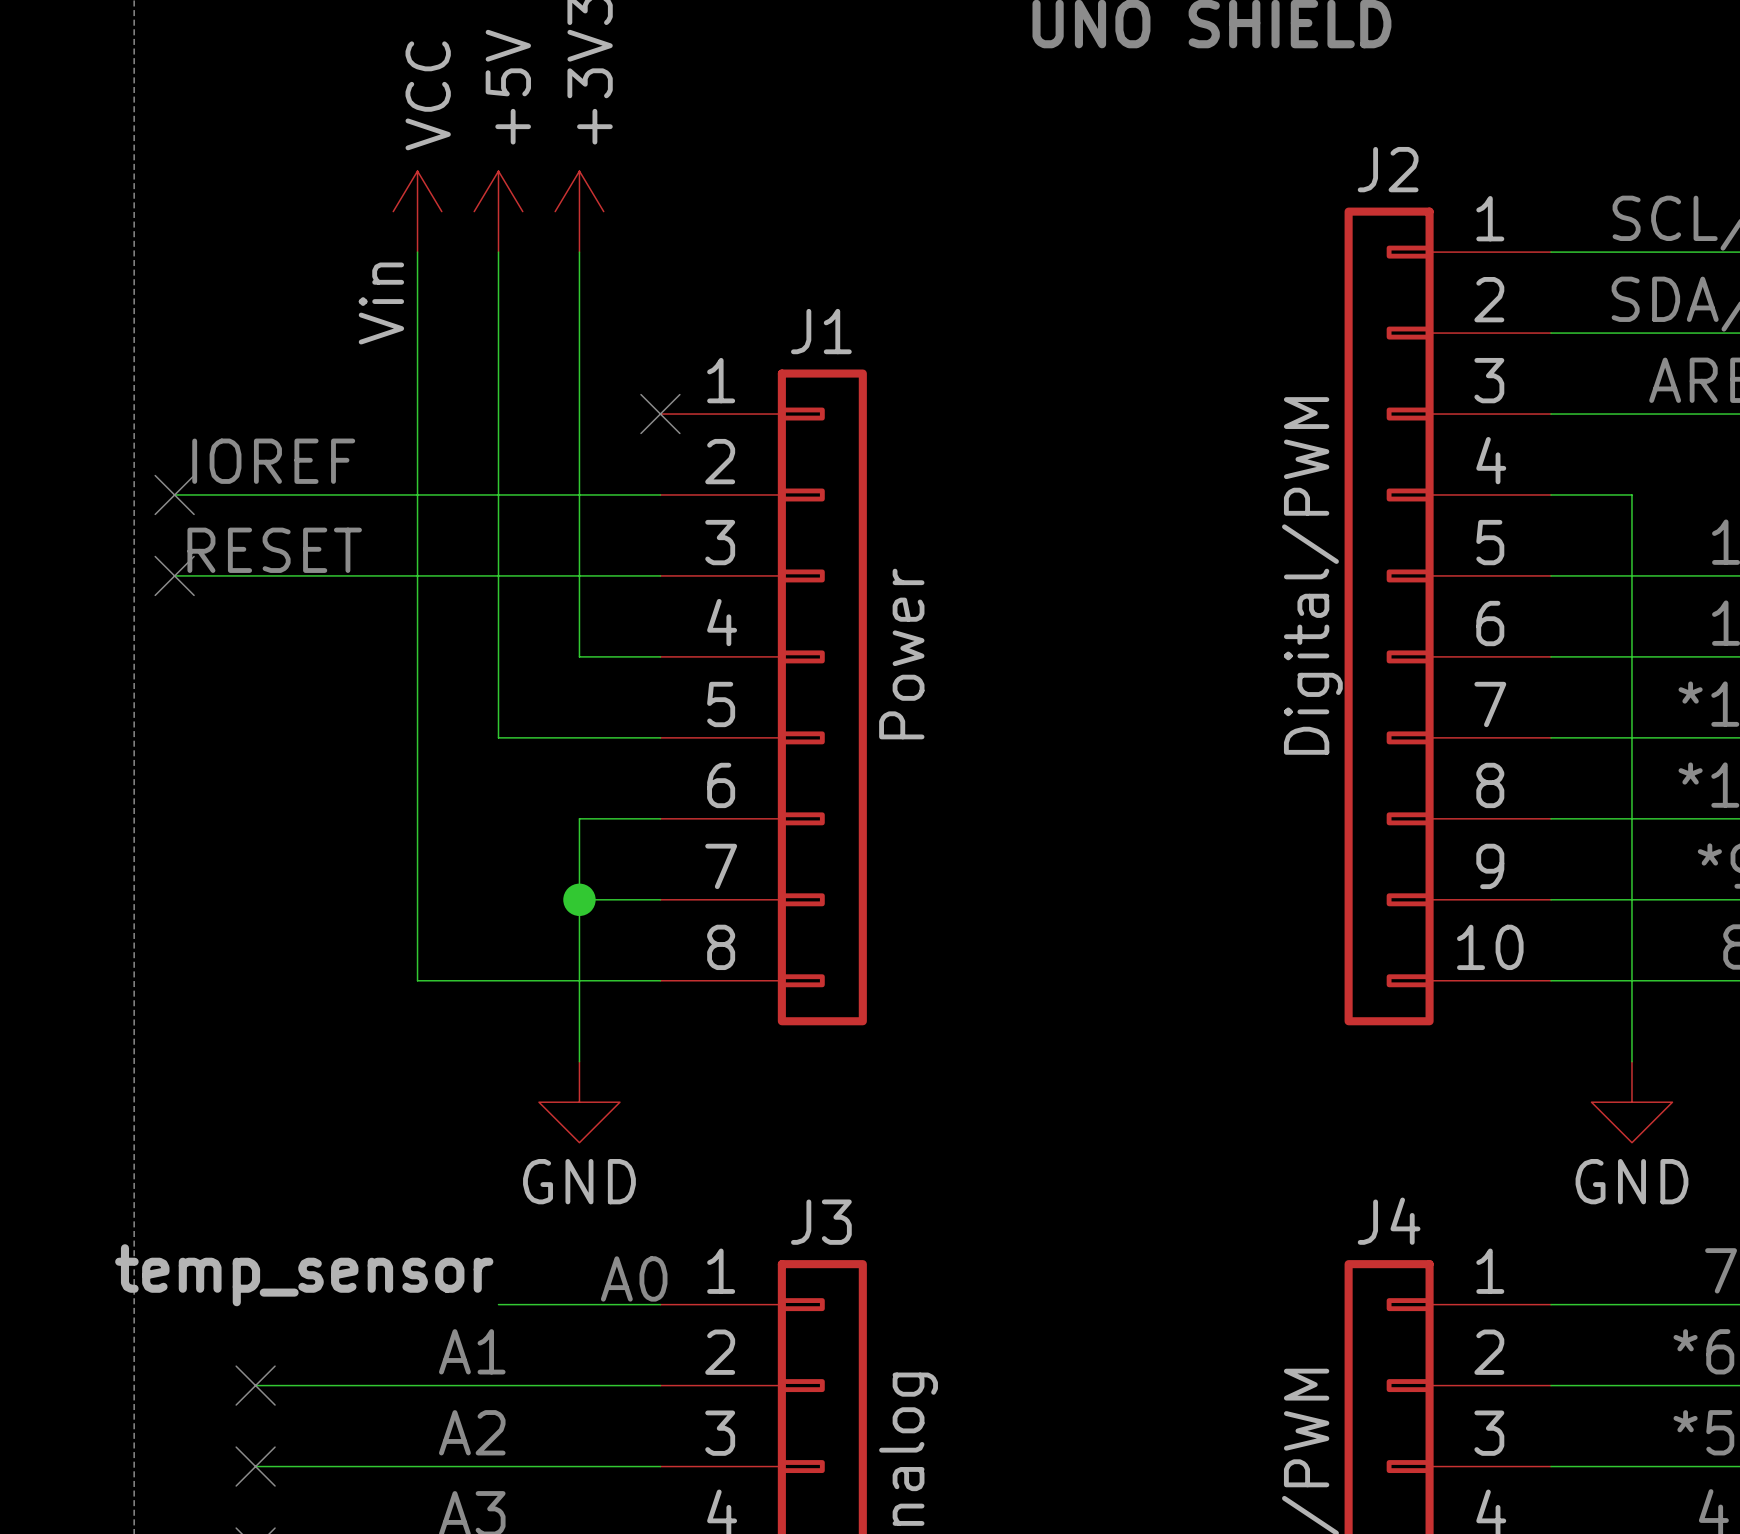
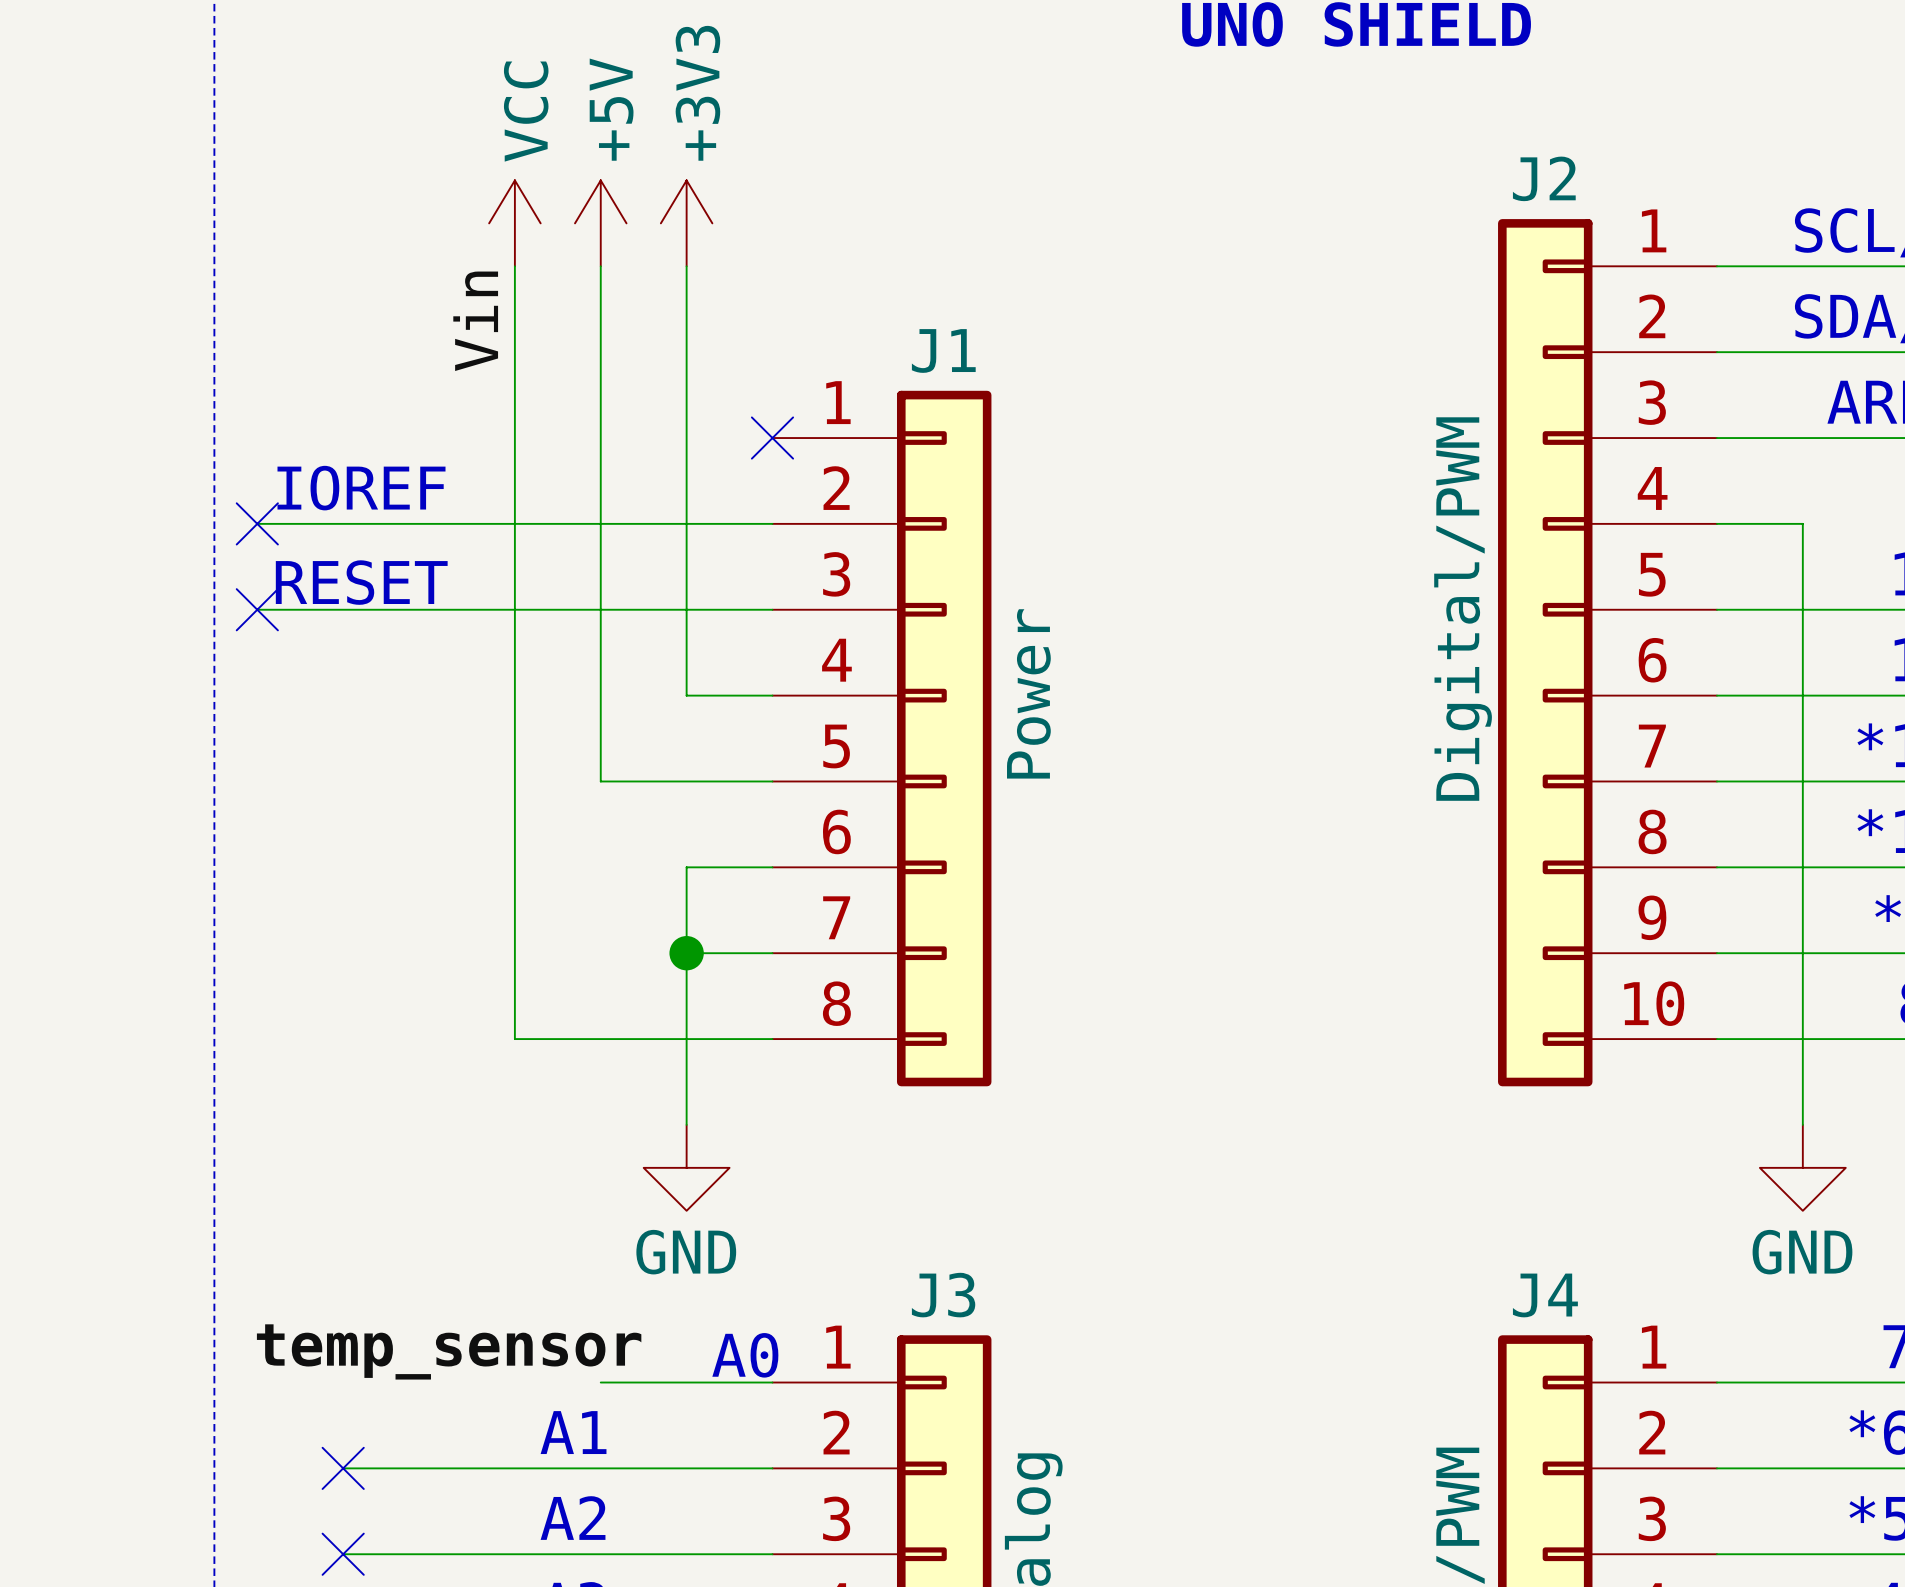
label position: temp_sensor (304, 1275) -> temp_sensor (449, 1351)

